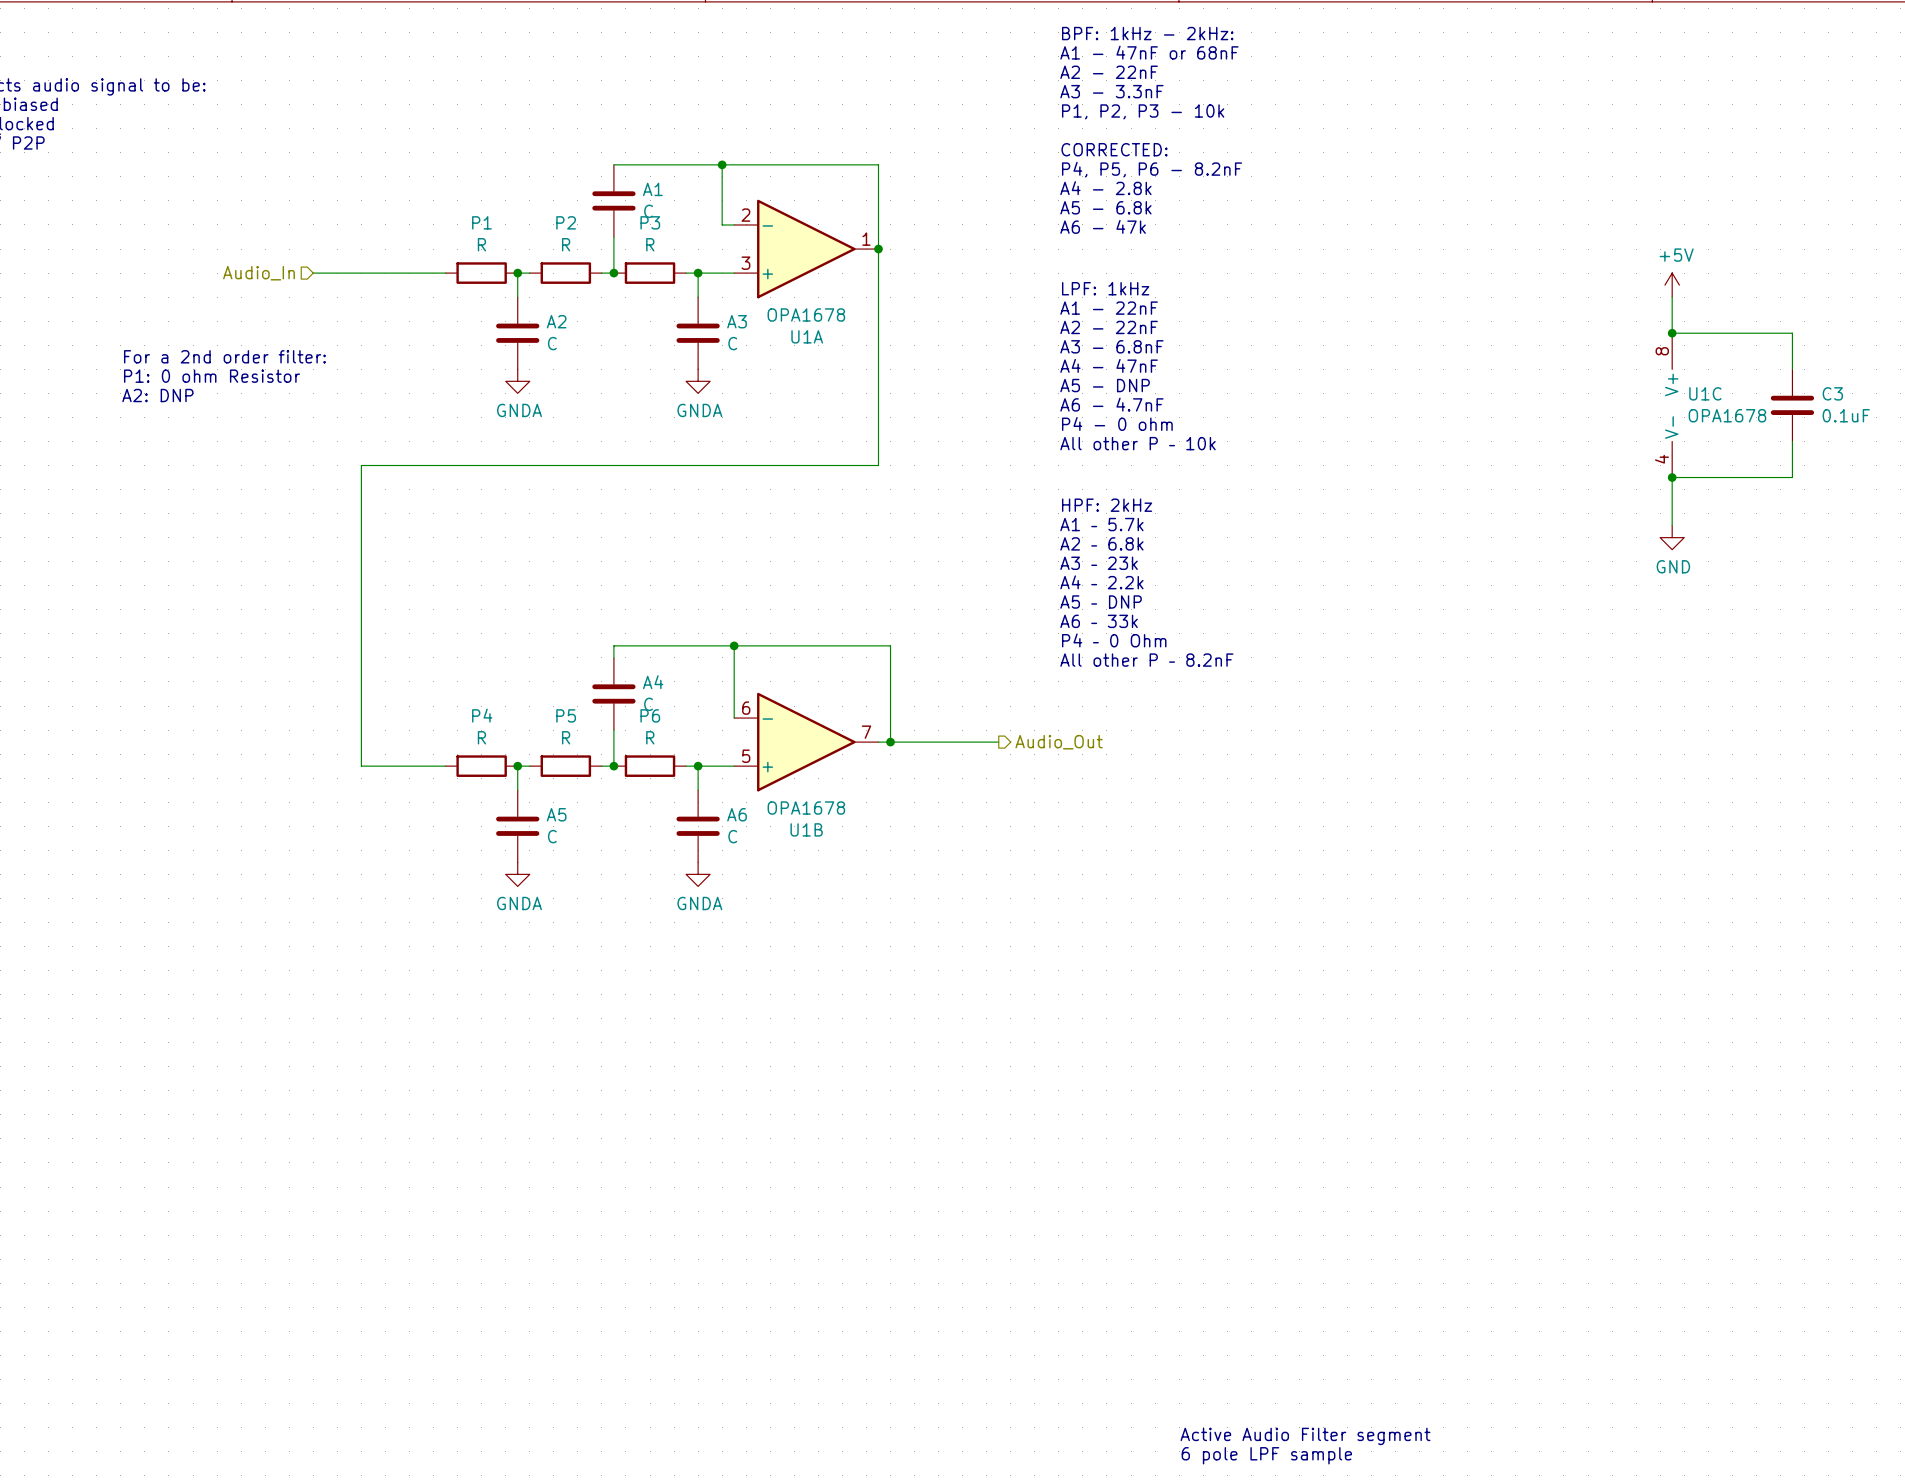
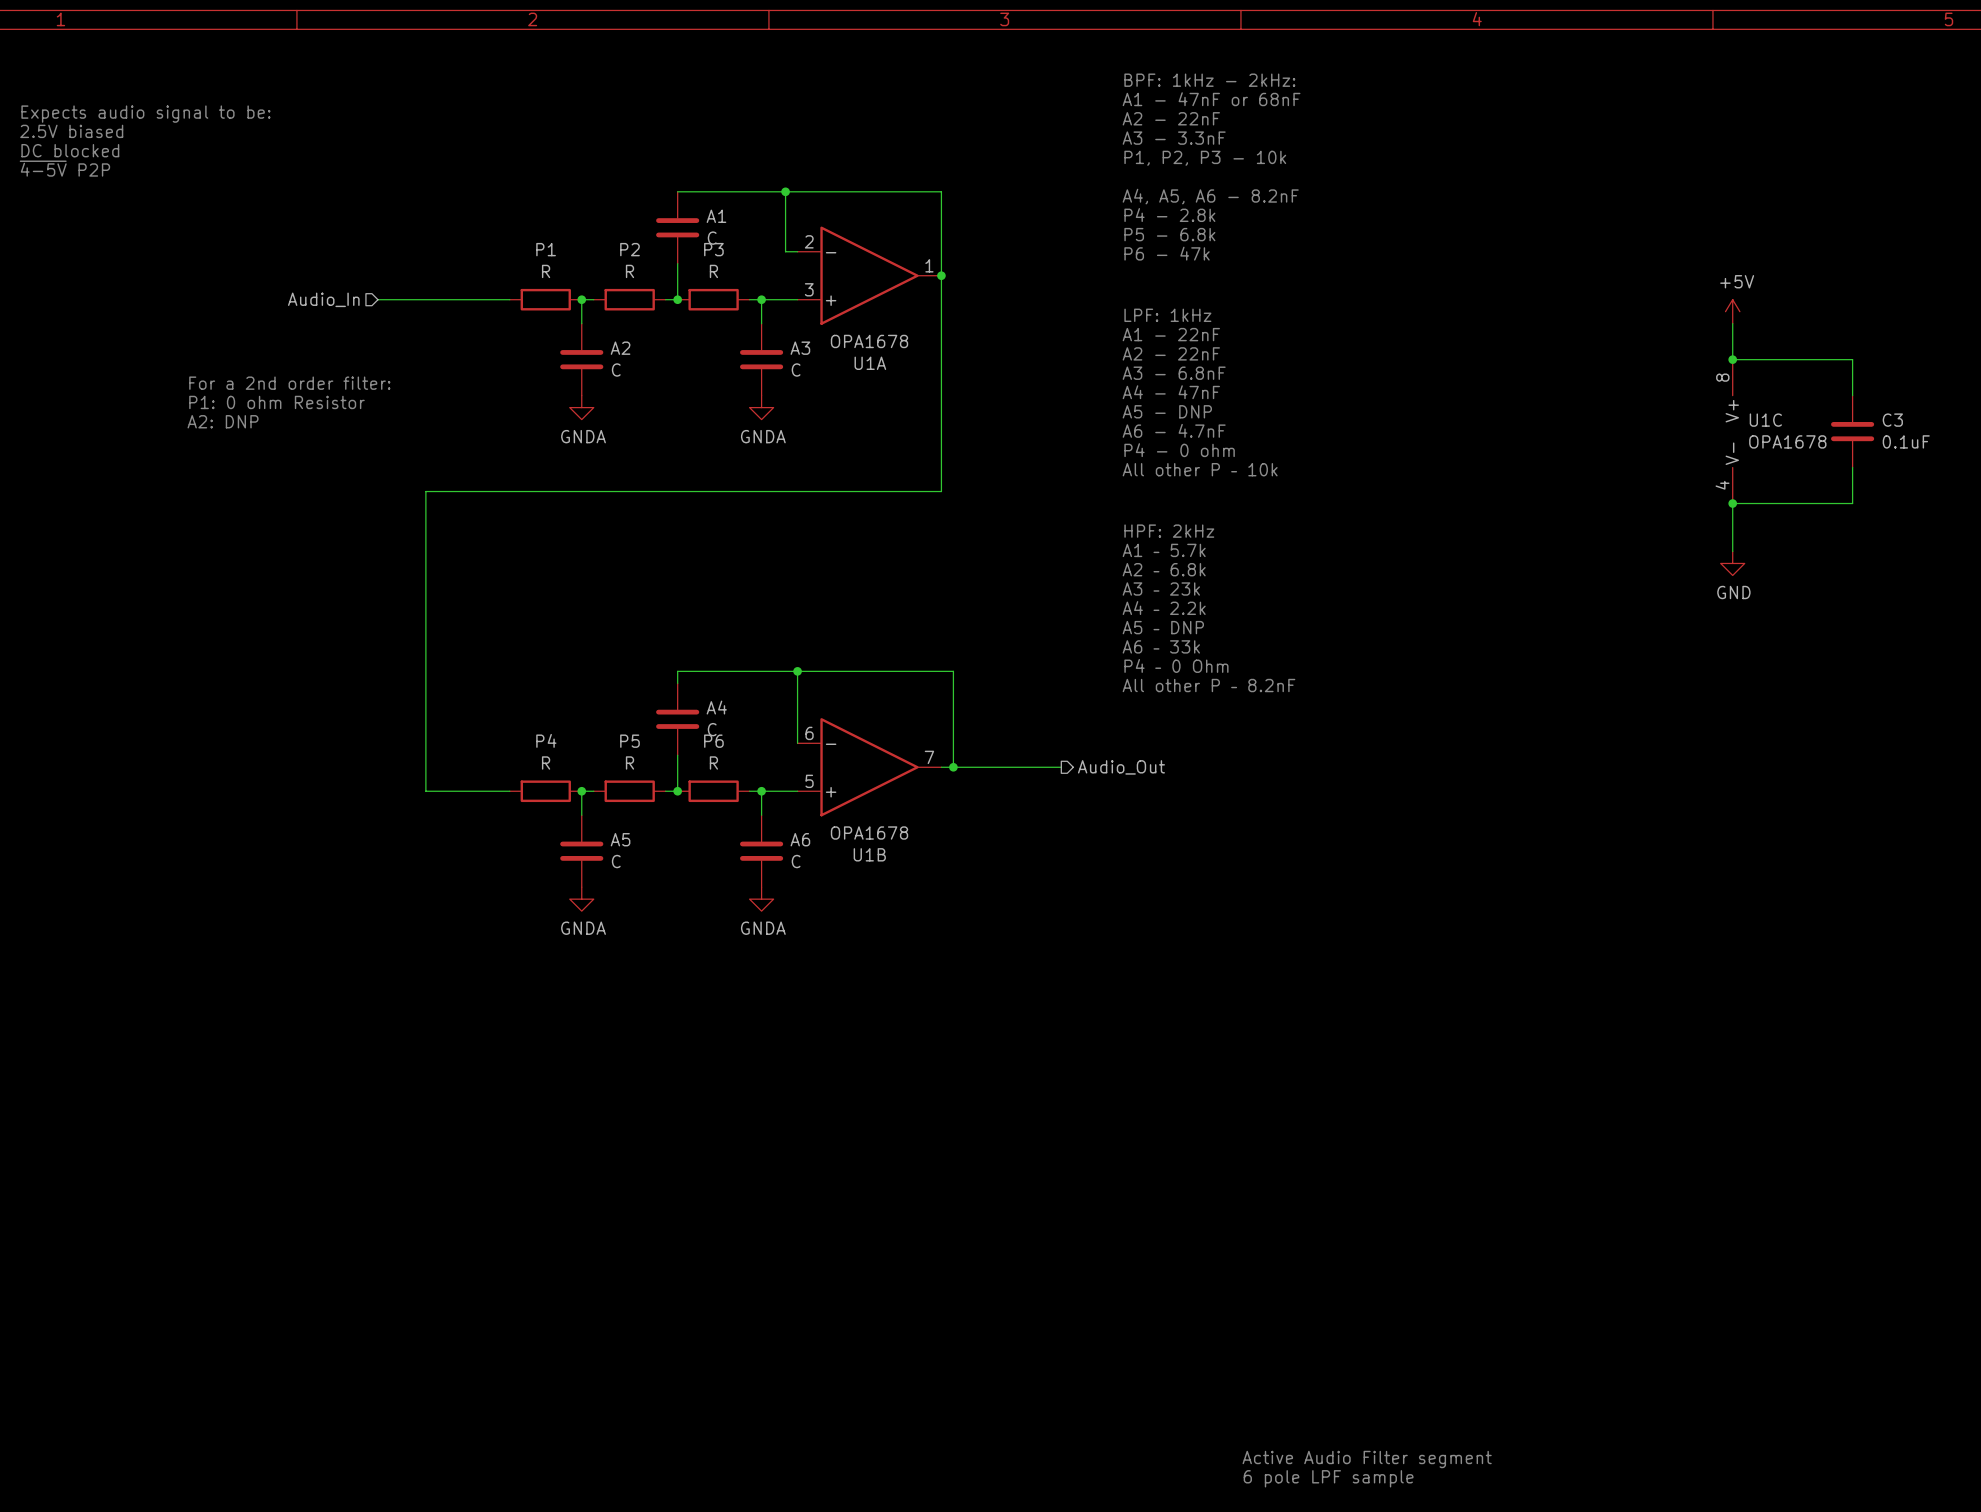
text: BPF: 1kHz - 2kHz: (1147, 33) -> none
text: A1 - 47nF or 68nF (1149, 52) -> BPF: 1kHz - 2kHz: (1209, 80)
text: A2 - 22nF (1109, 72) -> A1 - 47nF or 68nF (1211, 99)
text: A3 - 3.3nF (1111, 91) -> A2 - 22nF (1171, 118)
text: P1, P2, P3 - 10k (1143, 111) -> A3 - 3.3nF (1174, 138)
text: none -> P1, P2, P3 - 10k (1205, 158)
text: CORRECTED: (1114, 149) -> none
text: P4, P5, P6 - 8.2nF (1152, 169) -> A4, A5, A6 - 8.2nF (1210, 196)
text: A4 - 2.8k (1105, 188) -> P4 - 2.8k (1169, 215)
text: A5 - 6.8k (1105, 207) -> P5 - 6.8k (1169, 234)
text: A6 - 47k (1103, 226) -> P6 - 47k (1167, 253)

